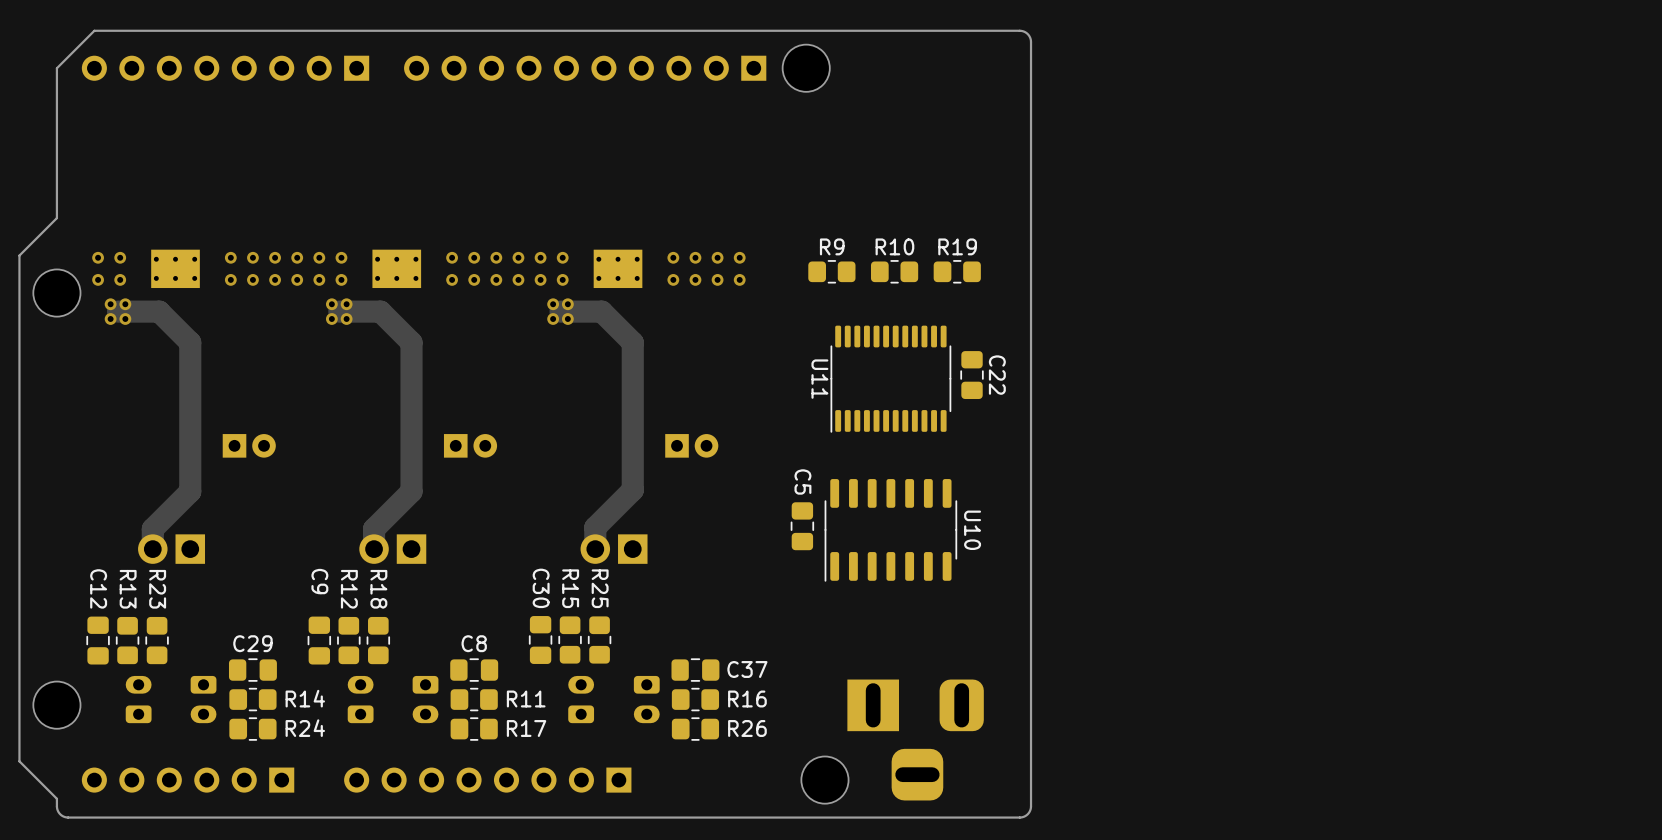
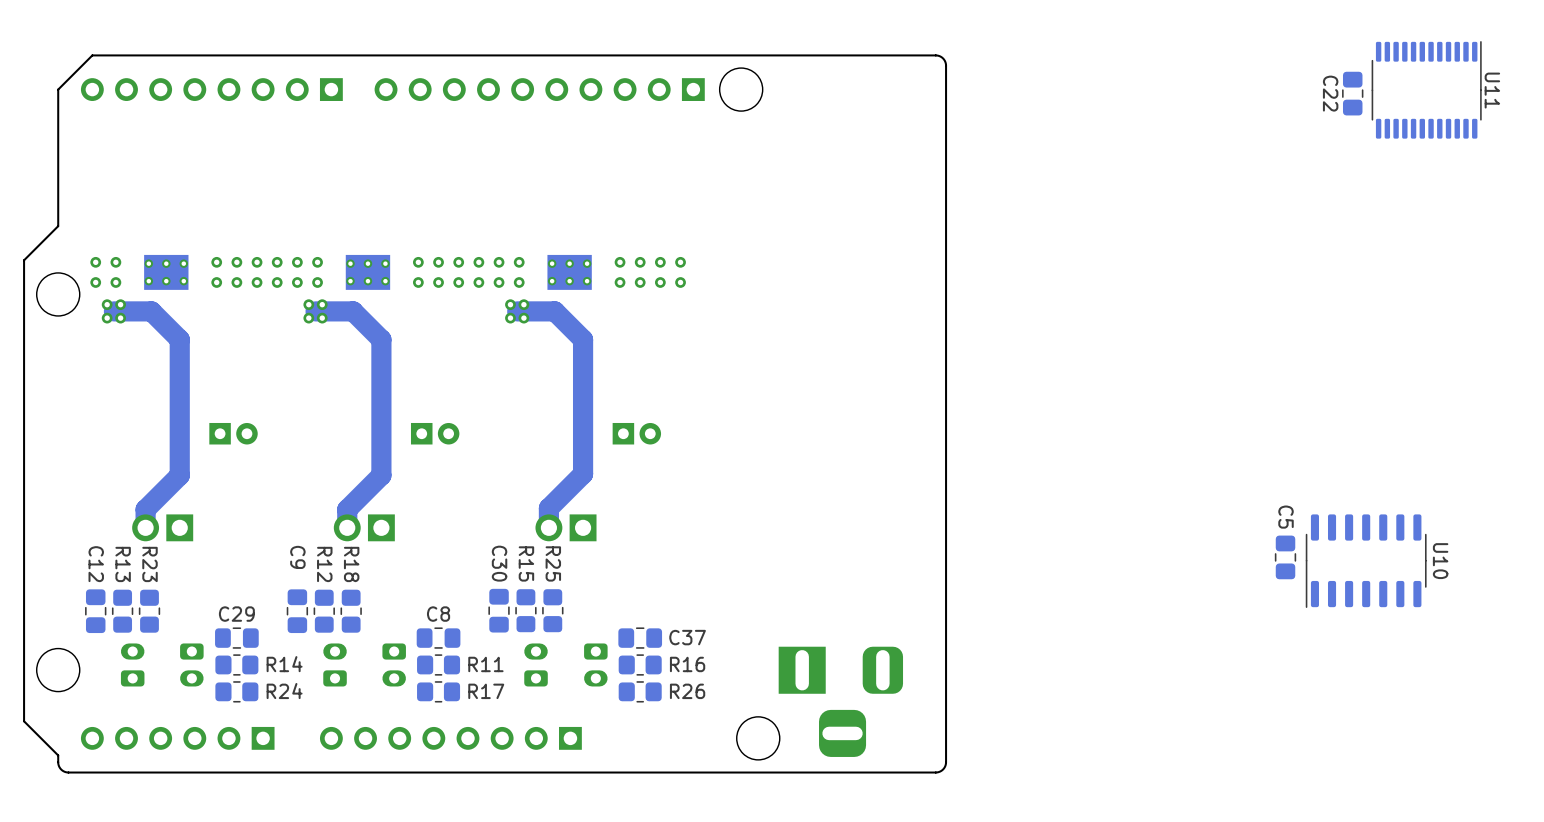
R9: (831, 271) -> none
R10: (894, 271) -> none
R19: (957, 271) -> none
C22 position: (972, 375) -> (1352, 93)
C22 name position: C22 (997, 375) -> C22 (1330, 93)
U11 rotation: 0° (890, 379) -> 180° (1426, 89)
U11 position: (890, 379) -> (1426, 89)
C5 position: (802, 526) -> (1285, 557)
U10 position: (890, 530) -> (1366, 561)

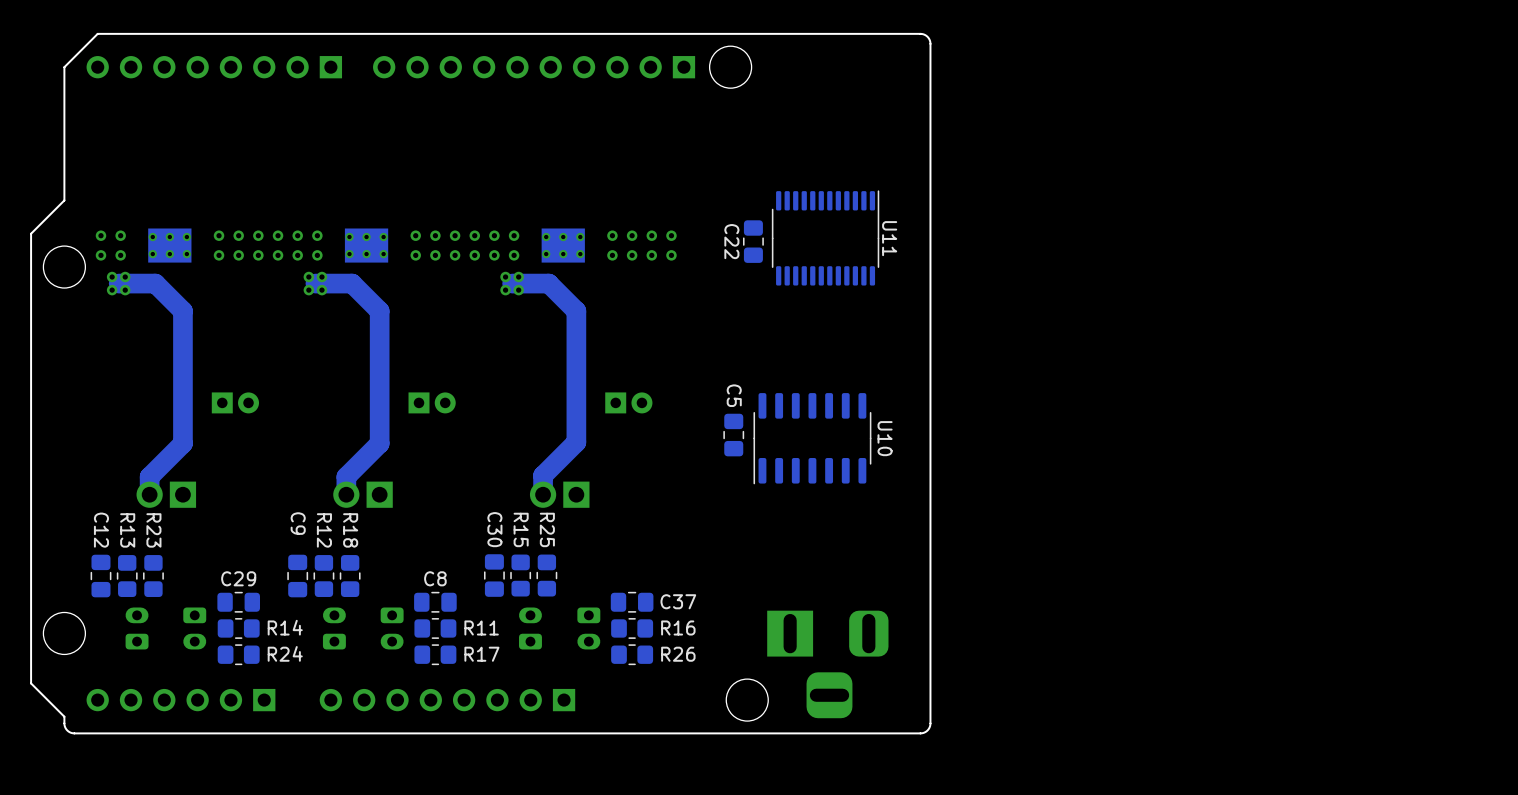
U11 position: (1426, 89) -> (825, 237)
C22 position: (1352, 93) -> (753, 241)
C5 position: (1285, 557) -> (733, 435)
U10 position: (1366, 561) -> (812, 438)

